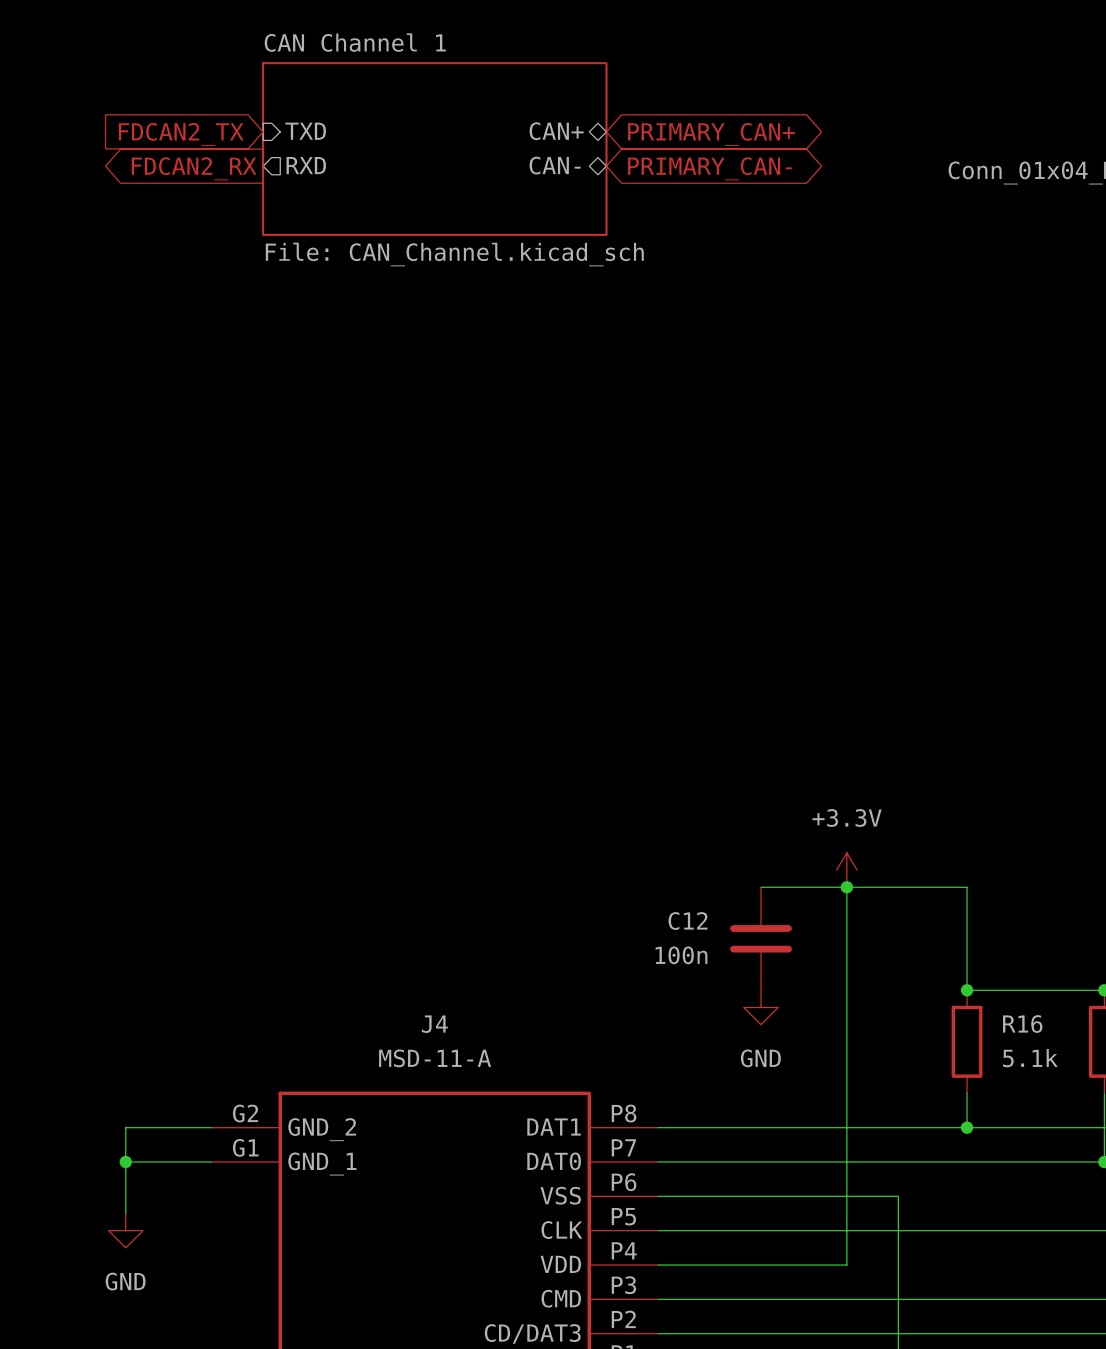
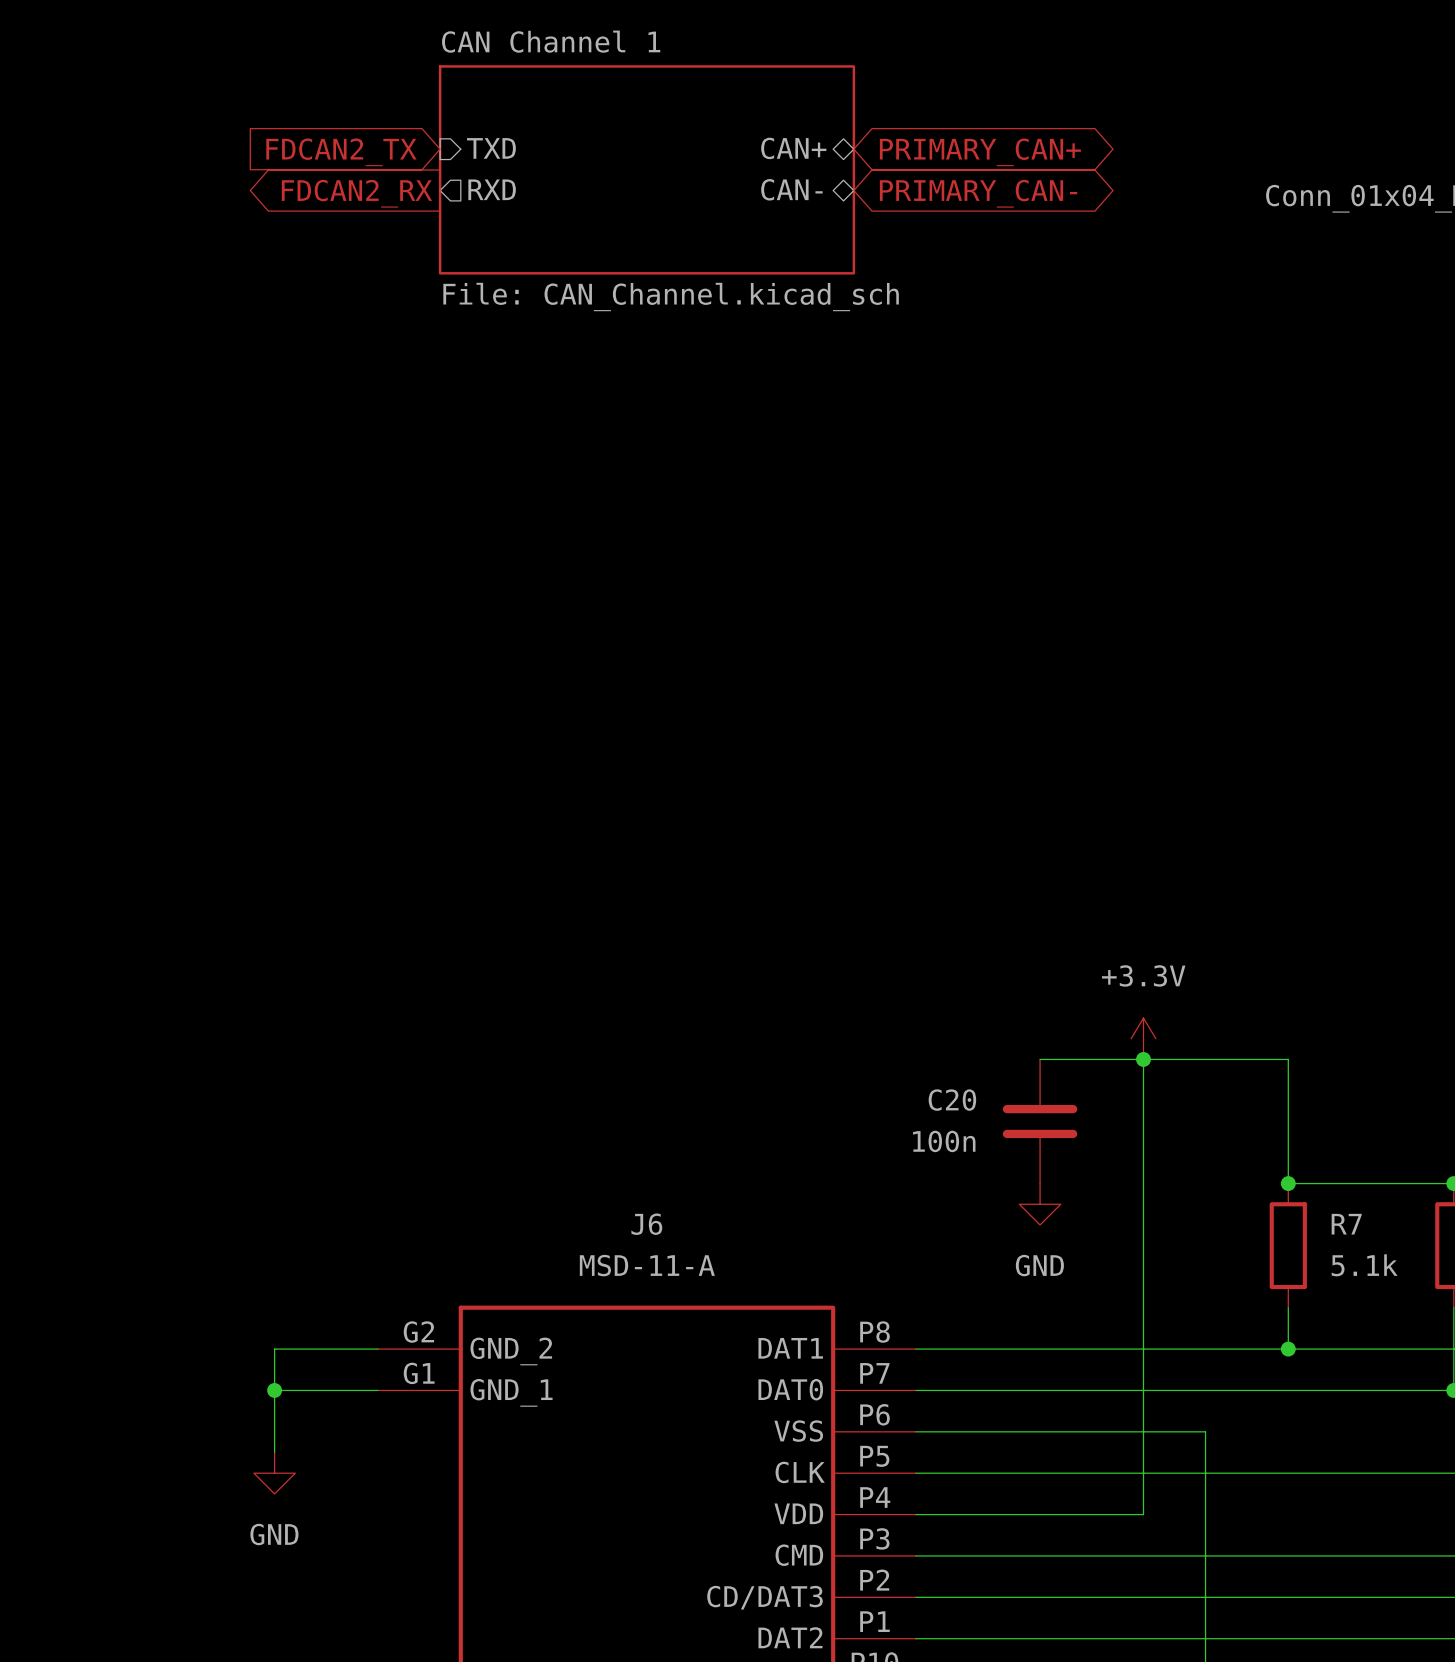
C12 name: C12 (688, 921) -> C20 (952, 1100)
J4 name: J4 (434, 1024) -> J6 (646, 1224)
R16 name: R16 (1022, 1024) -> R7 (1346, 1224)

